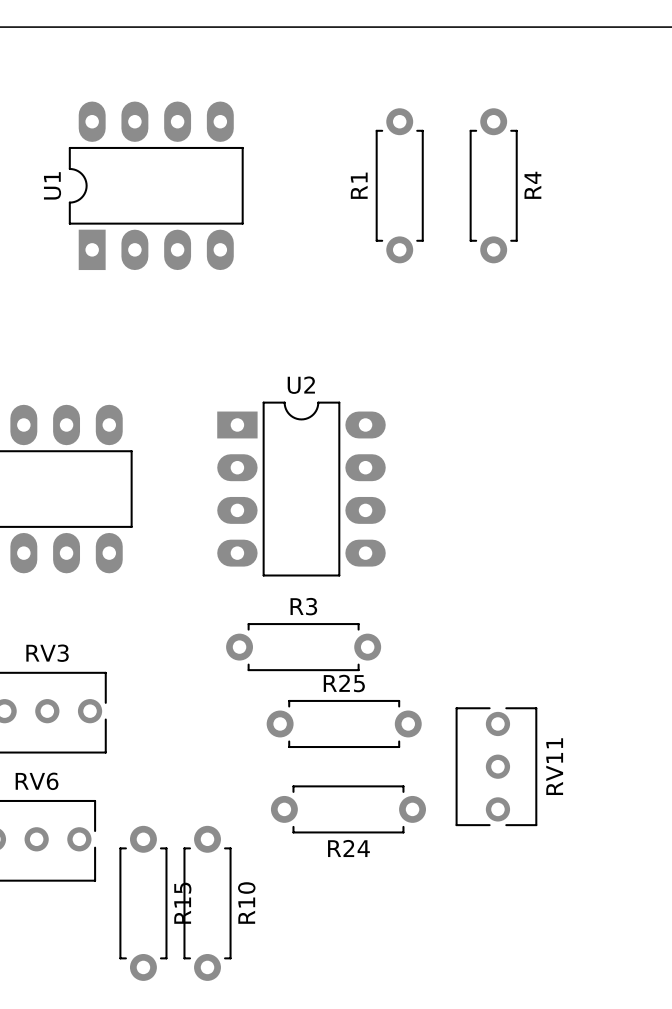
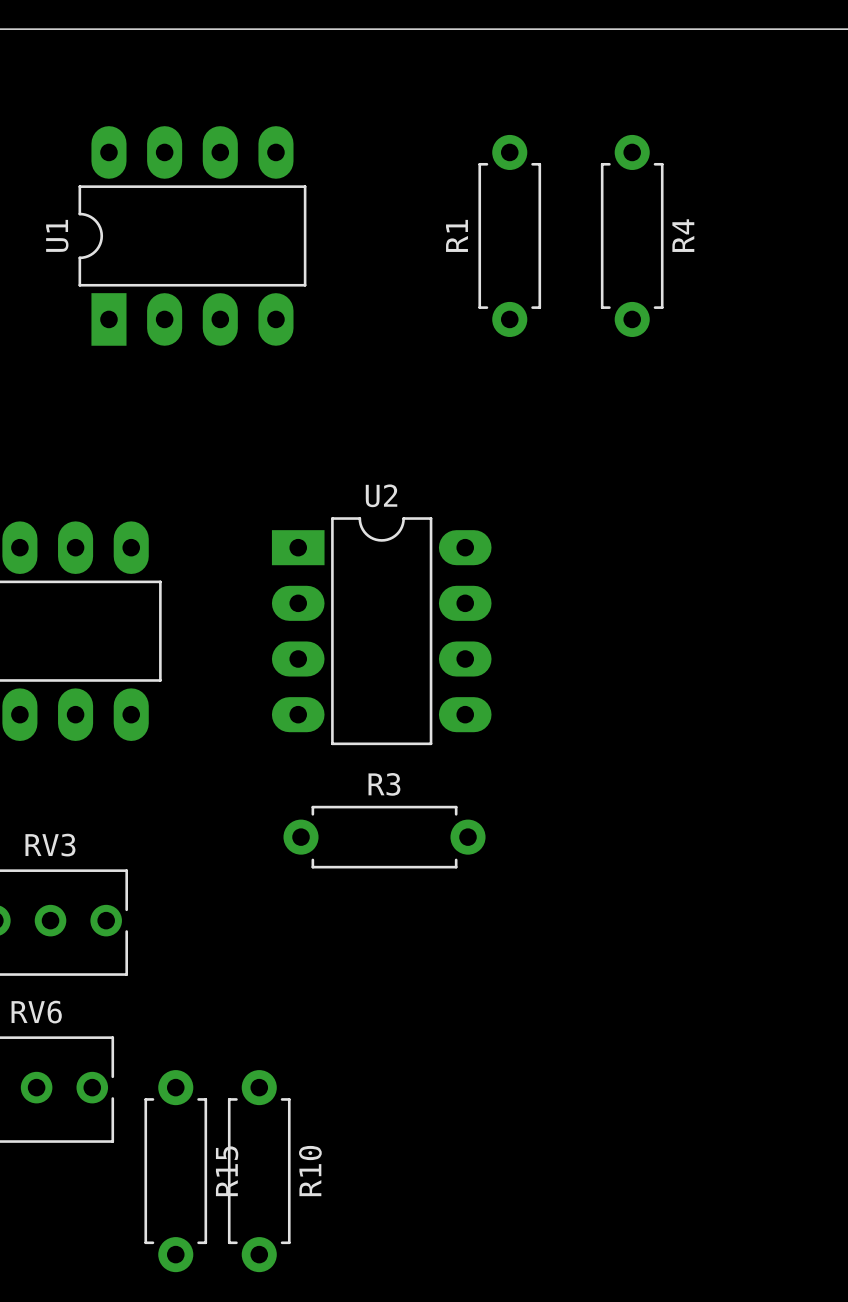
R25: (344, 723) -> none
RV11: (496, 766) -> none
R24: (348, 809) -> none

